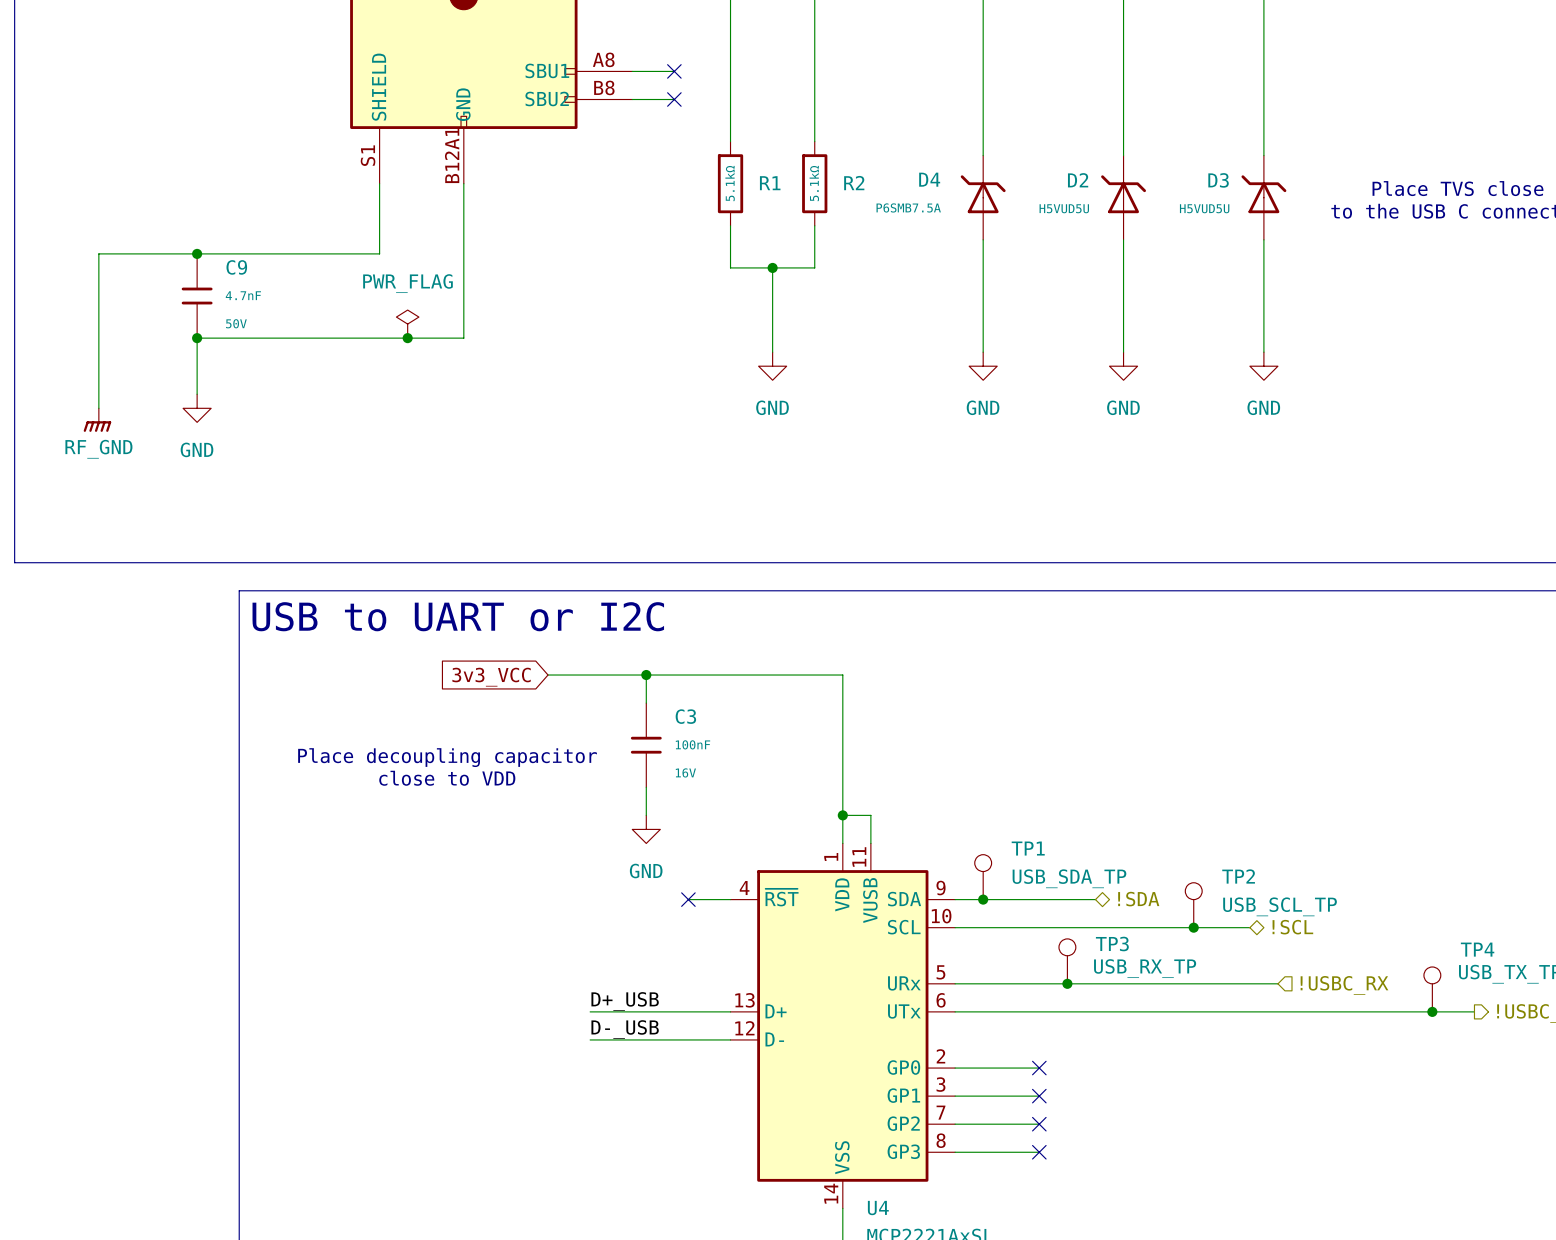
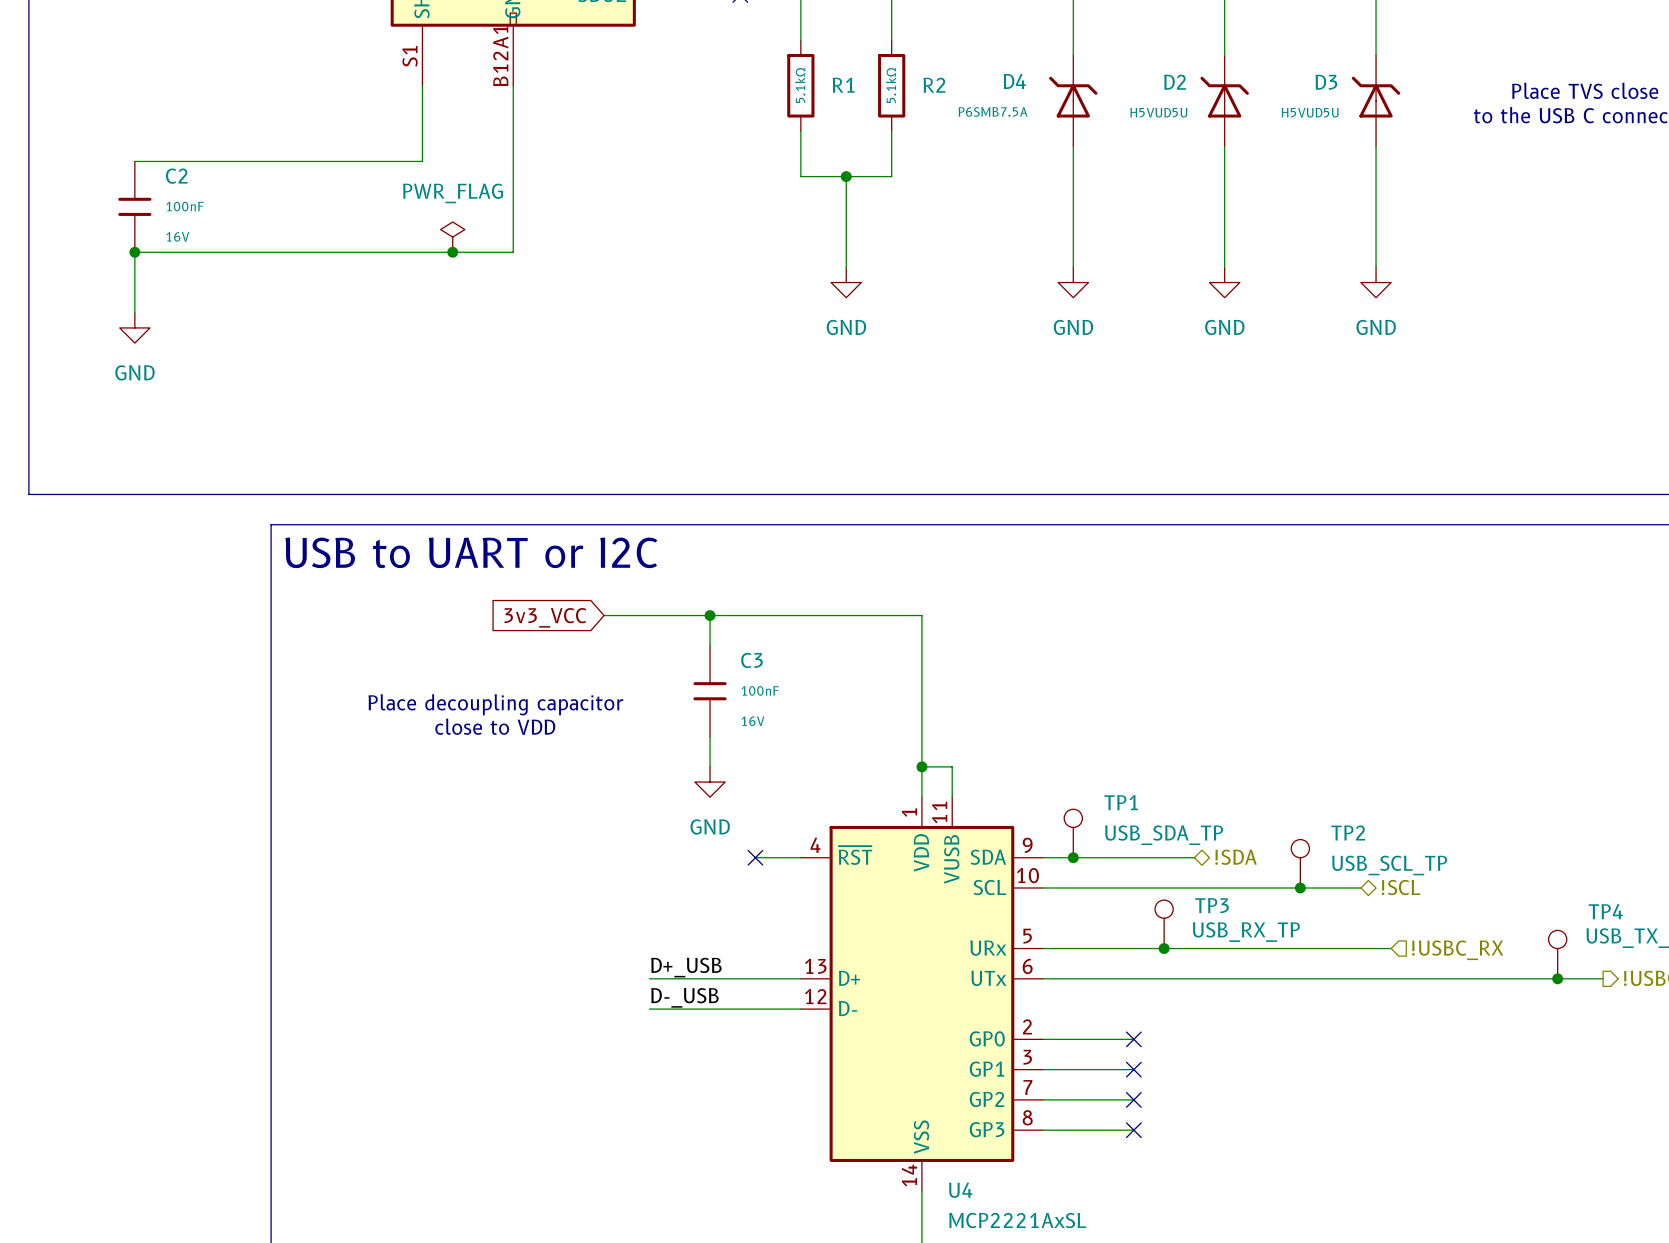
wire: (112, 253) (98, 253) (98, 408) -> none
junction: (197, 253) -> none
C2: none -> 100nF (134, 206)
C9: 4.7nF (197, 296) -> none
junction: none -> (134, 252)
wire: (197, 338) (197, 394) -> (225, 252) (134, 252) (134, 312)
junction: (197, 338) -> none
power symbol position: GND (197, 408) -> GND (134, 327)
power symbol: RF_GND (97, 420) -> none

